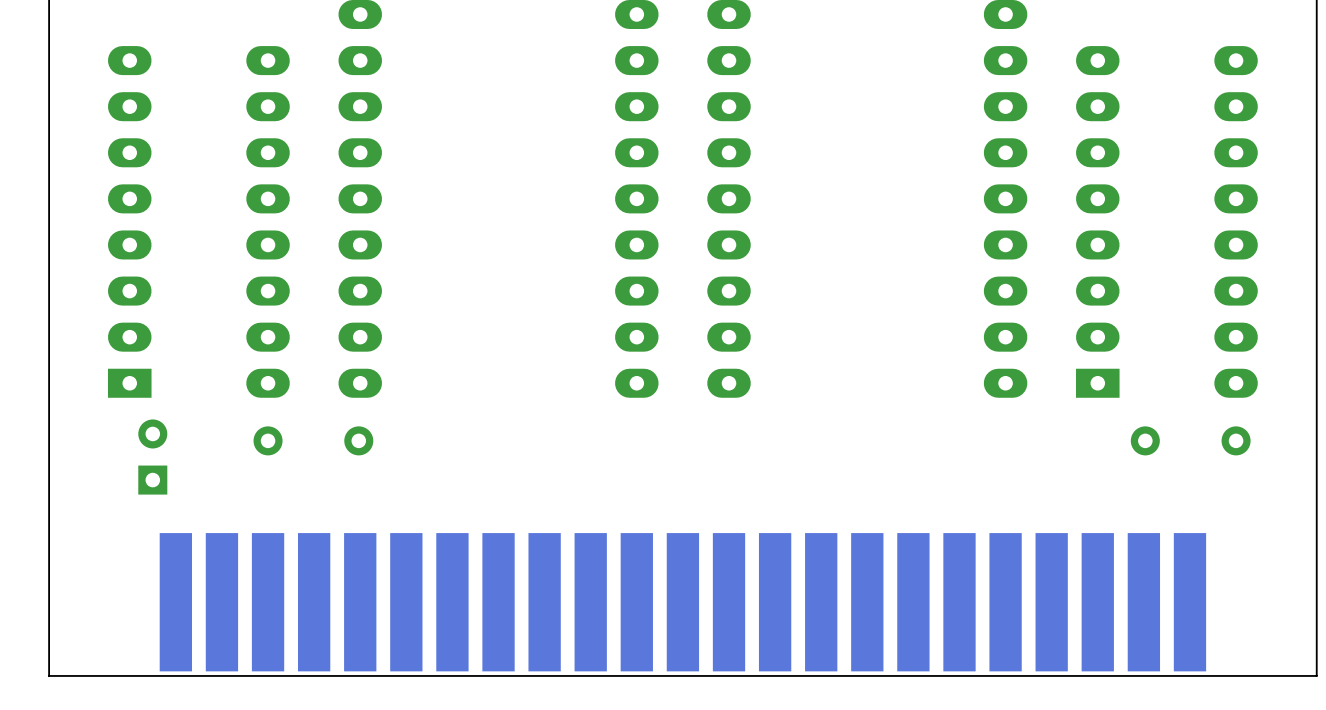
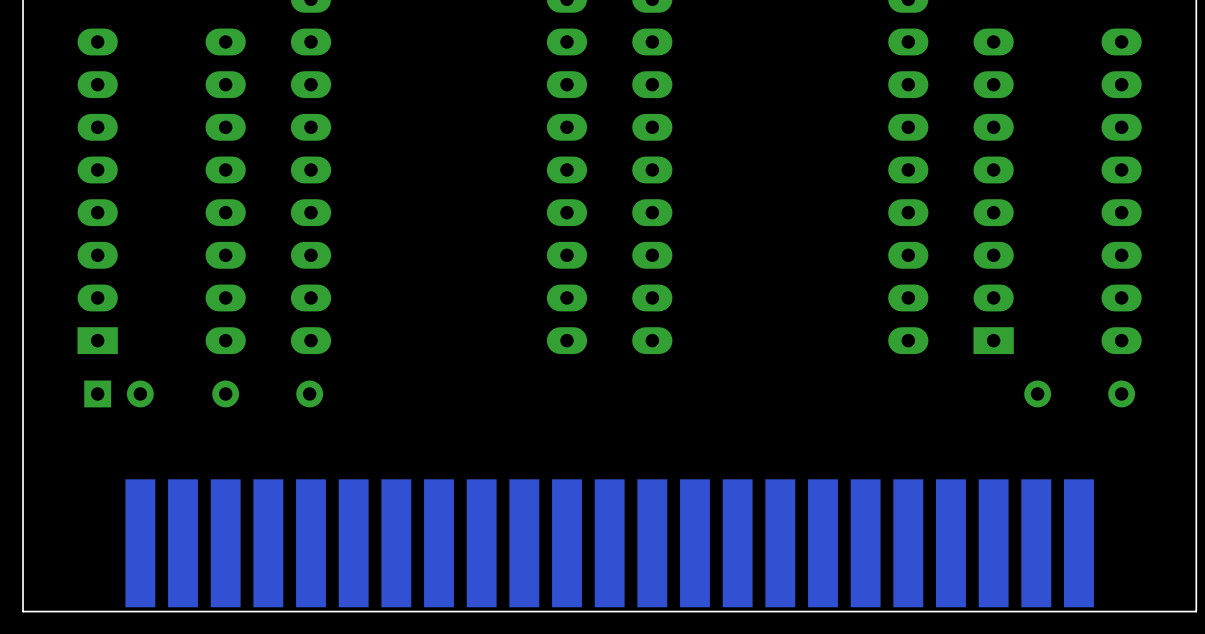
part rotation: 0° (152, 457) -> 90° clockwise (119, 393)

